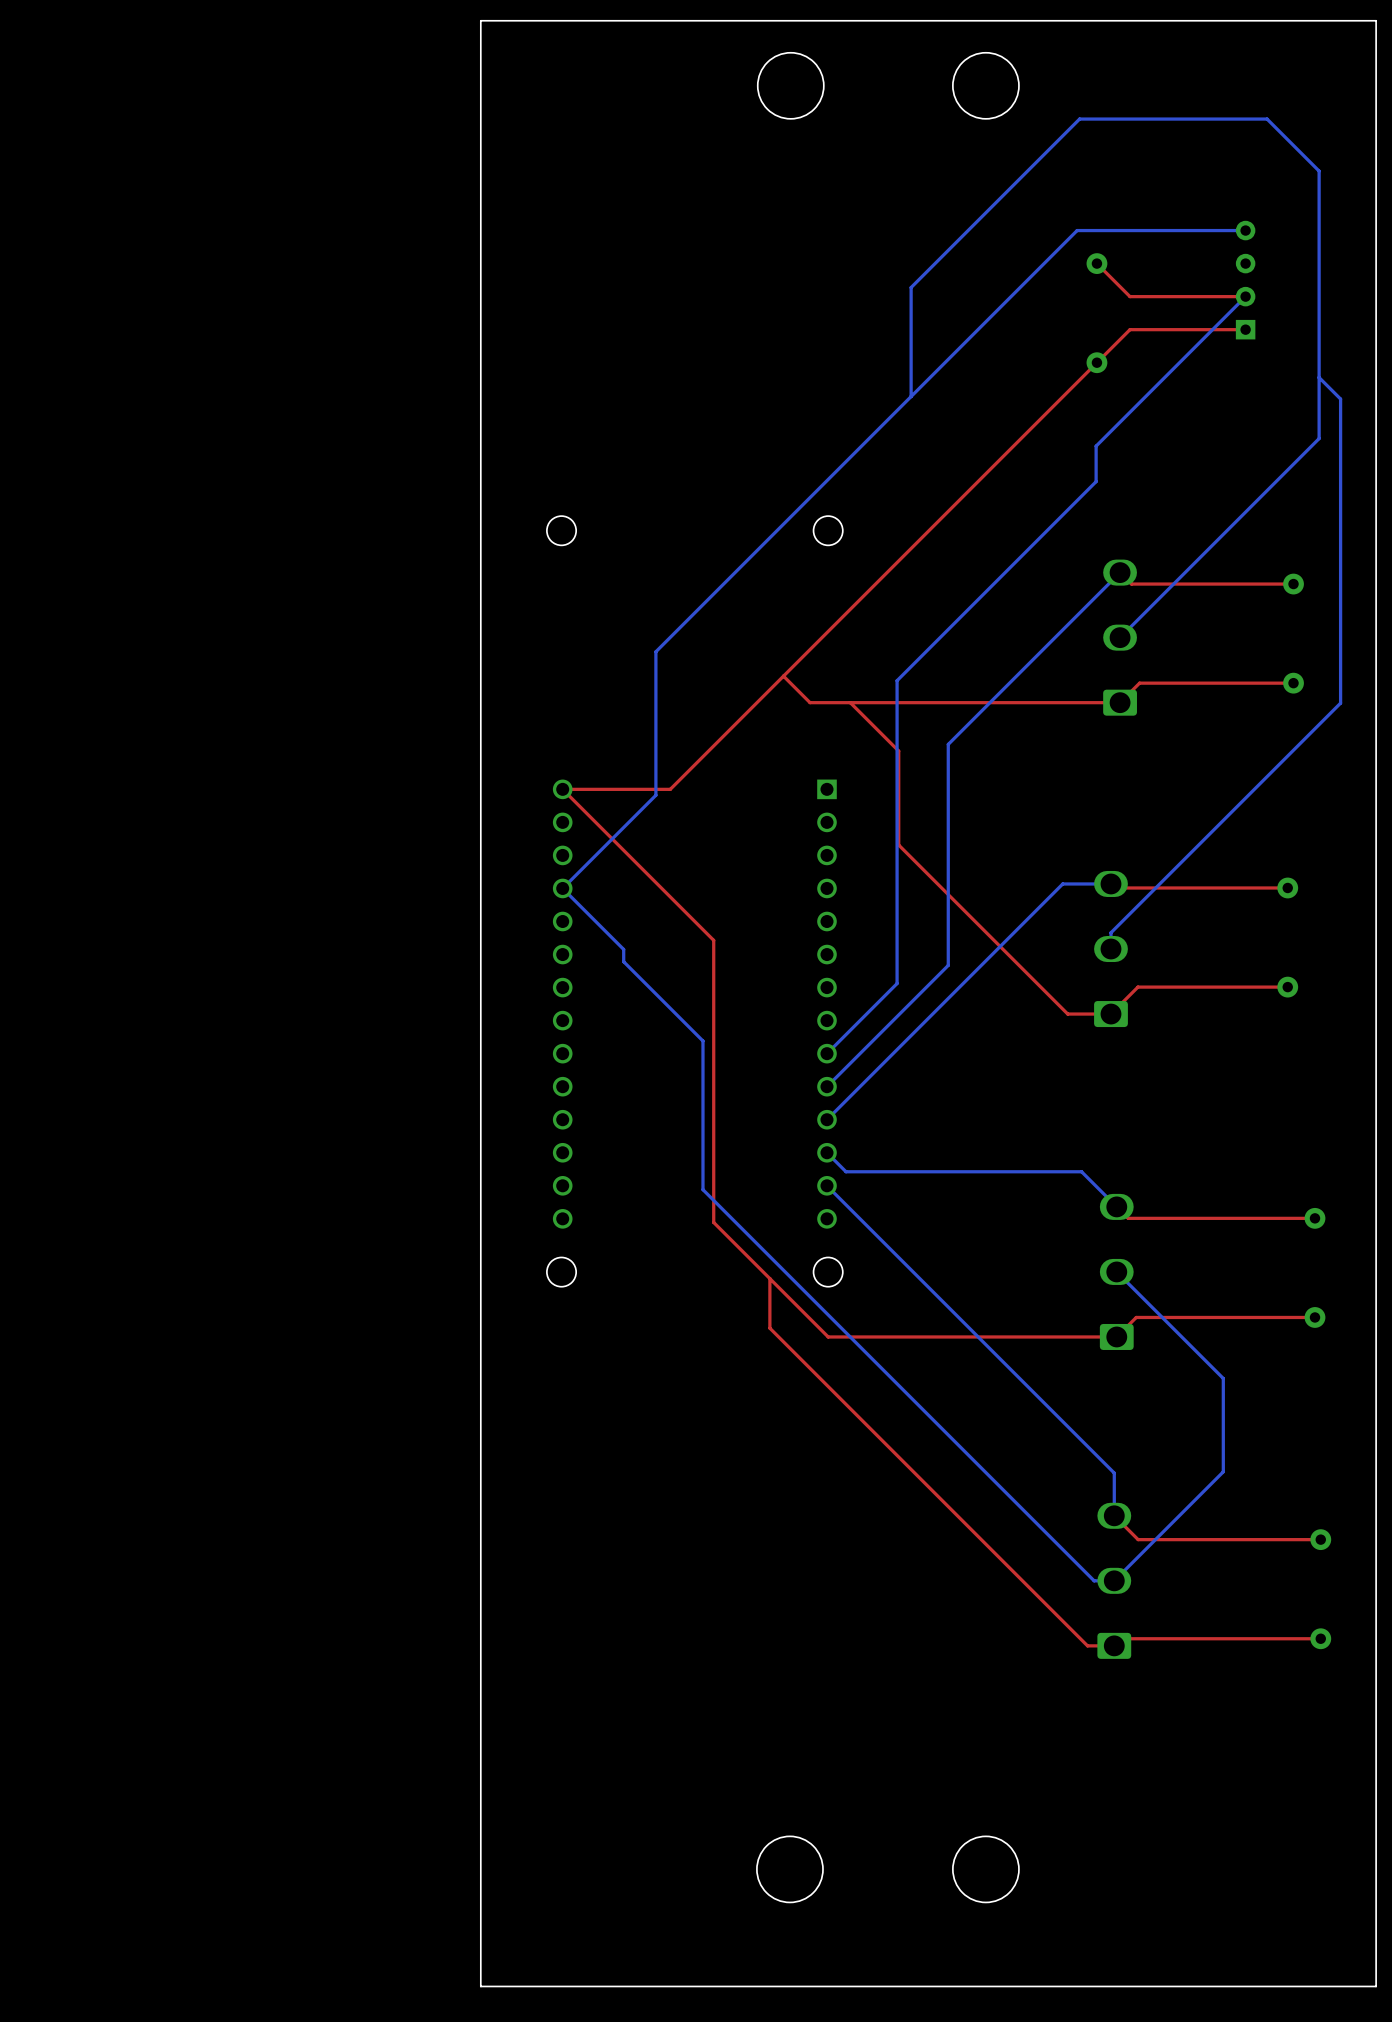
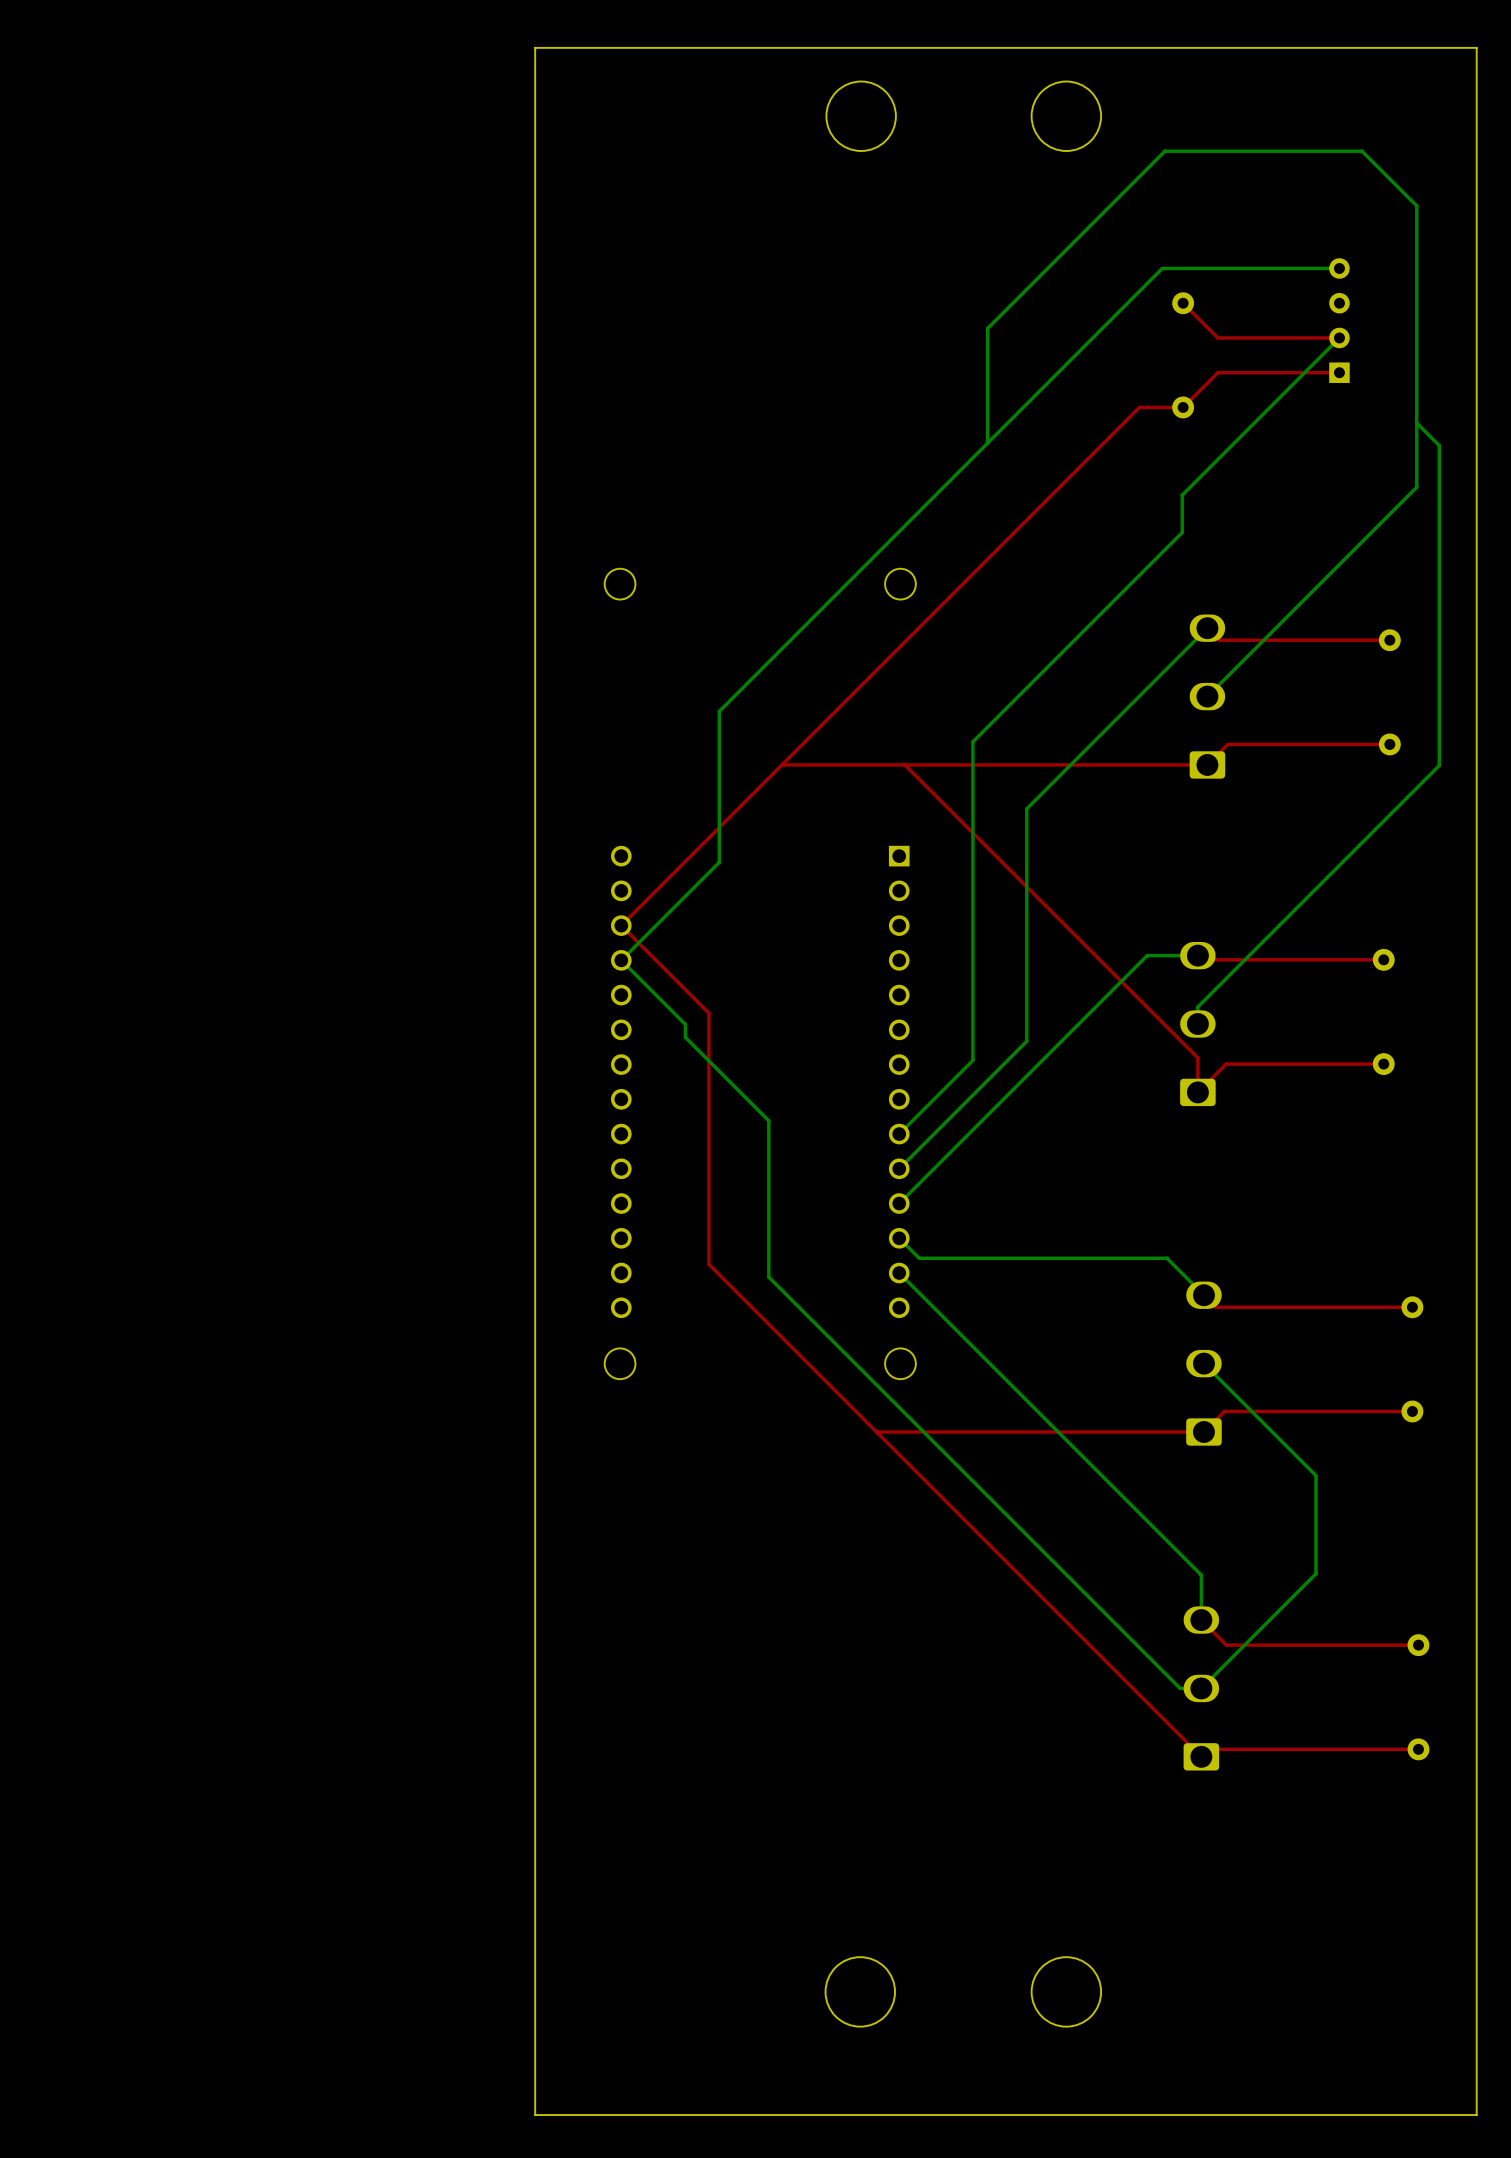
top track: (1096, 362) (670, 789) (562, 789) (713, 940) (713, 1222) (828, 1336) -> (1183, 407) (1139, 407) (621, 925) (708, 1013) (708, 1264) (1201, 1756)
top track: (783, 676) (810, 702) -> (781, 764) (881, 764)
top track: (850, 702) (898, 751) (898, 845) (1067, 1014) (1110, 1014) -> (904, 764) (1197, 1057) (1197, 1092)
top track: (769, 1278) (769, 1328) (1087, 1645) (1114, 1645) -> none
top track: none -> (900, 1432) (877, 1432)

